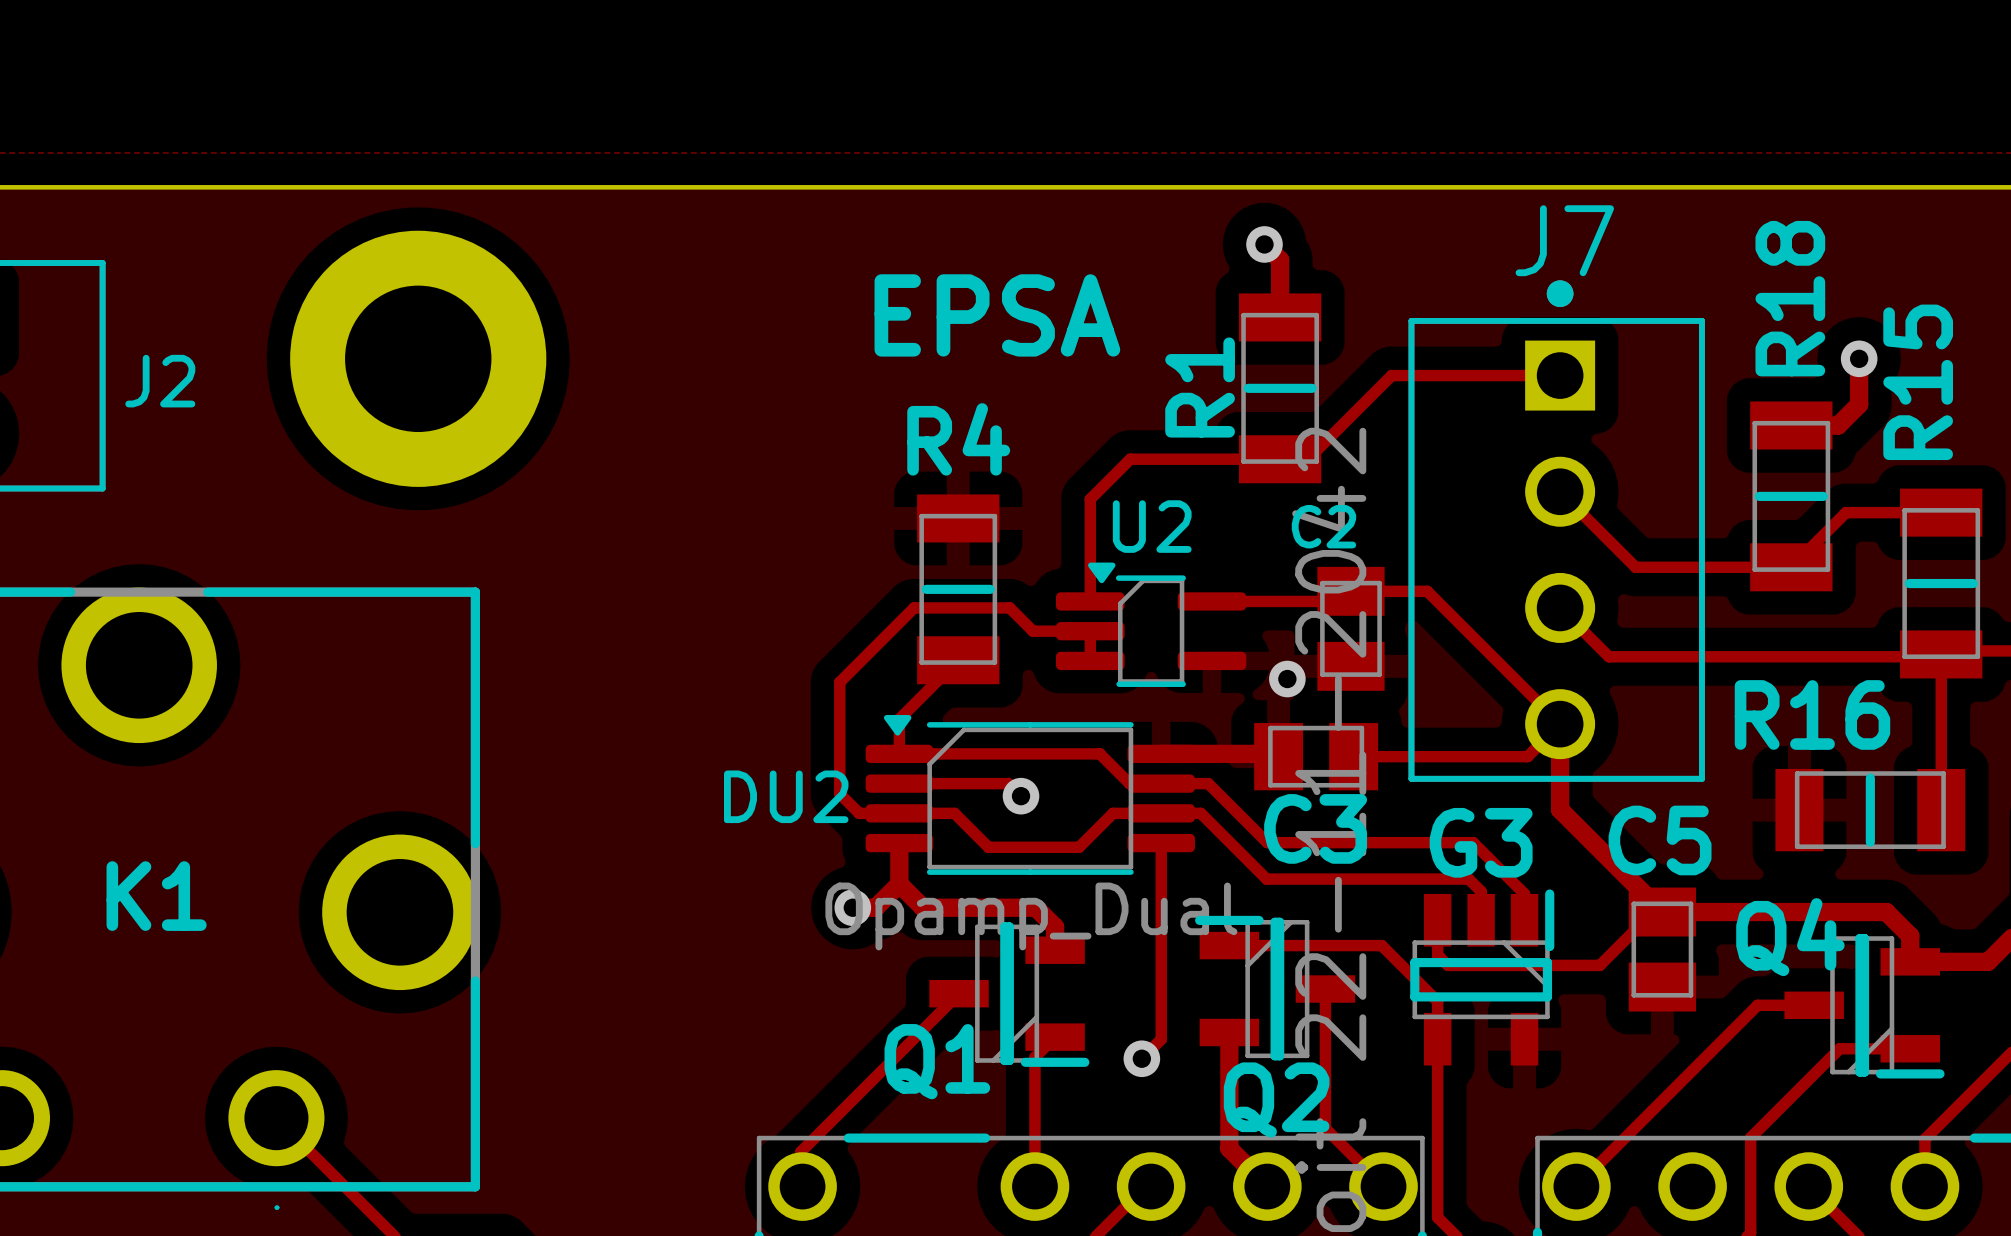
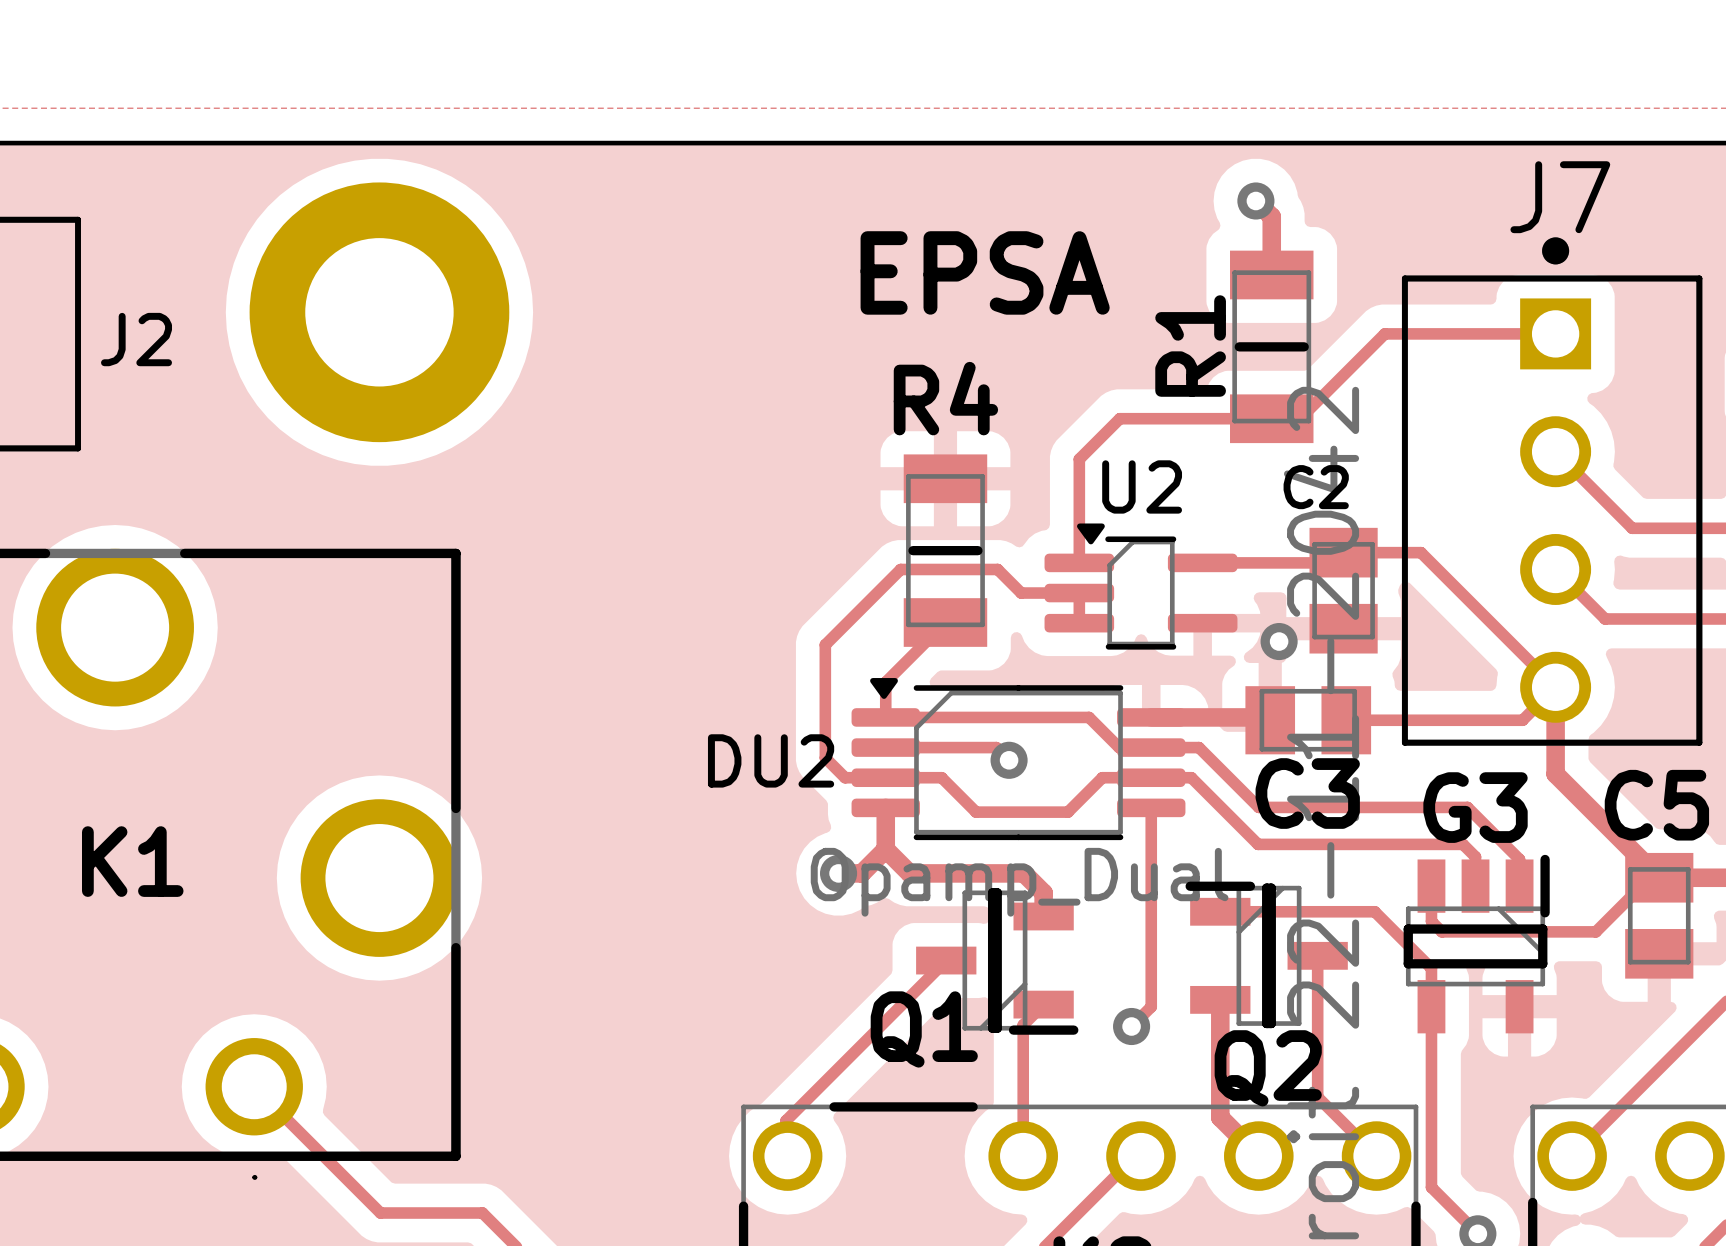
part position: (418, 358) -> (379, 312)

